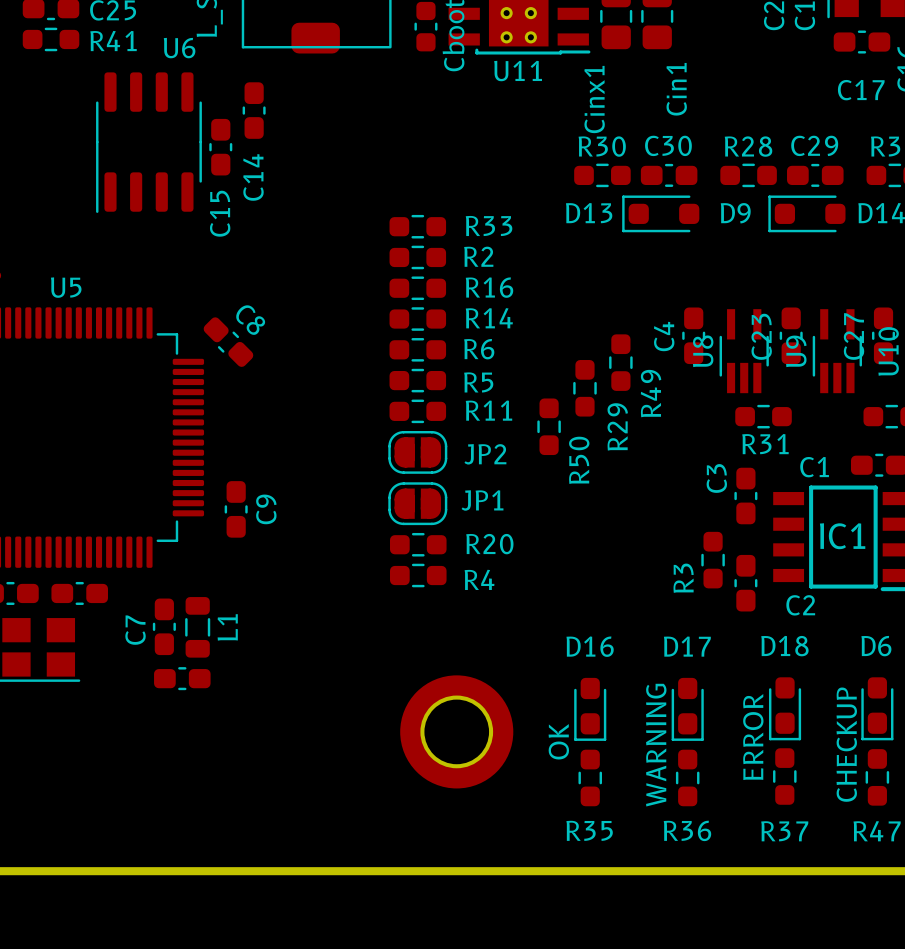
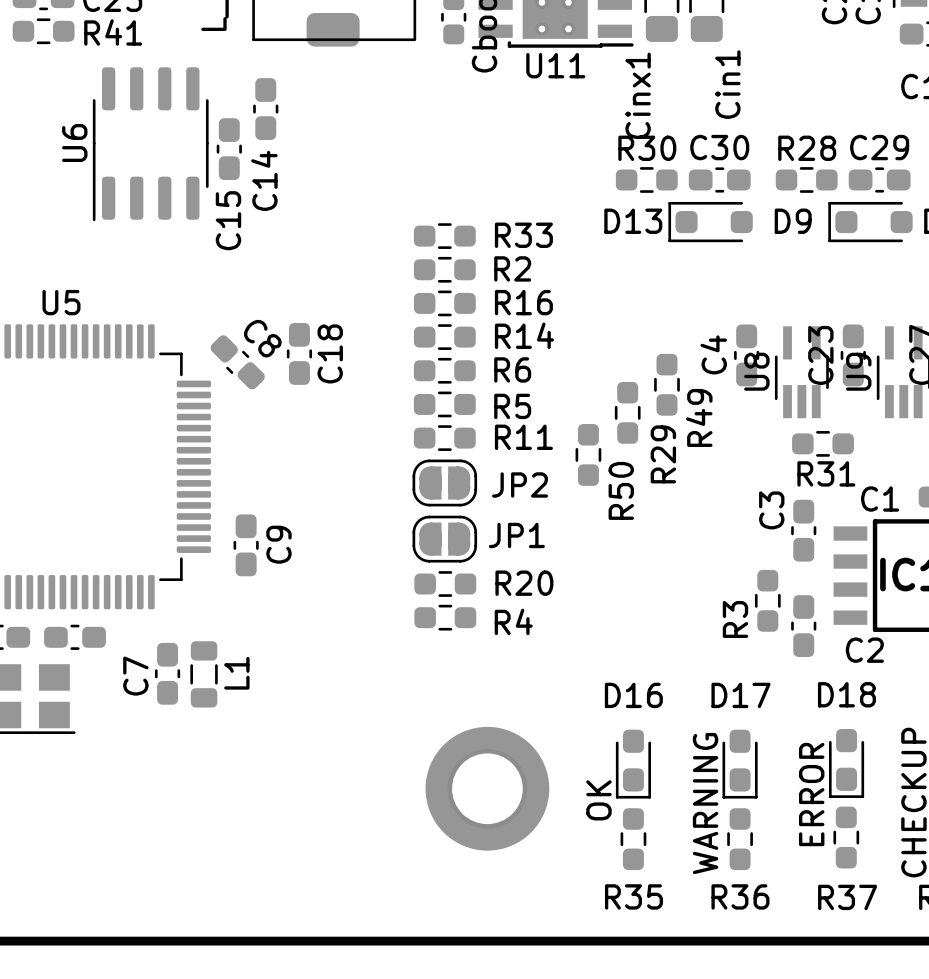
U6 name rotation: 0° (179, 48) -> 90° counterclockwise (74, 142)
U6 name position: U6 (179, 48) -> U6 (74, 142)
C18: none -> (299, 353)
part: (182, 678) -> none

